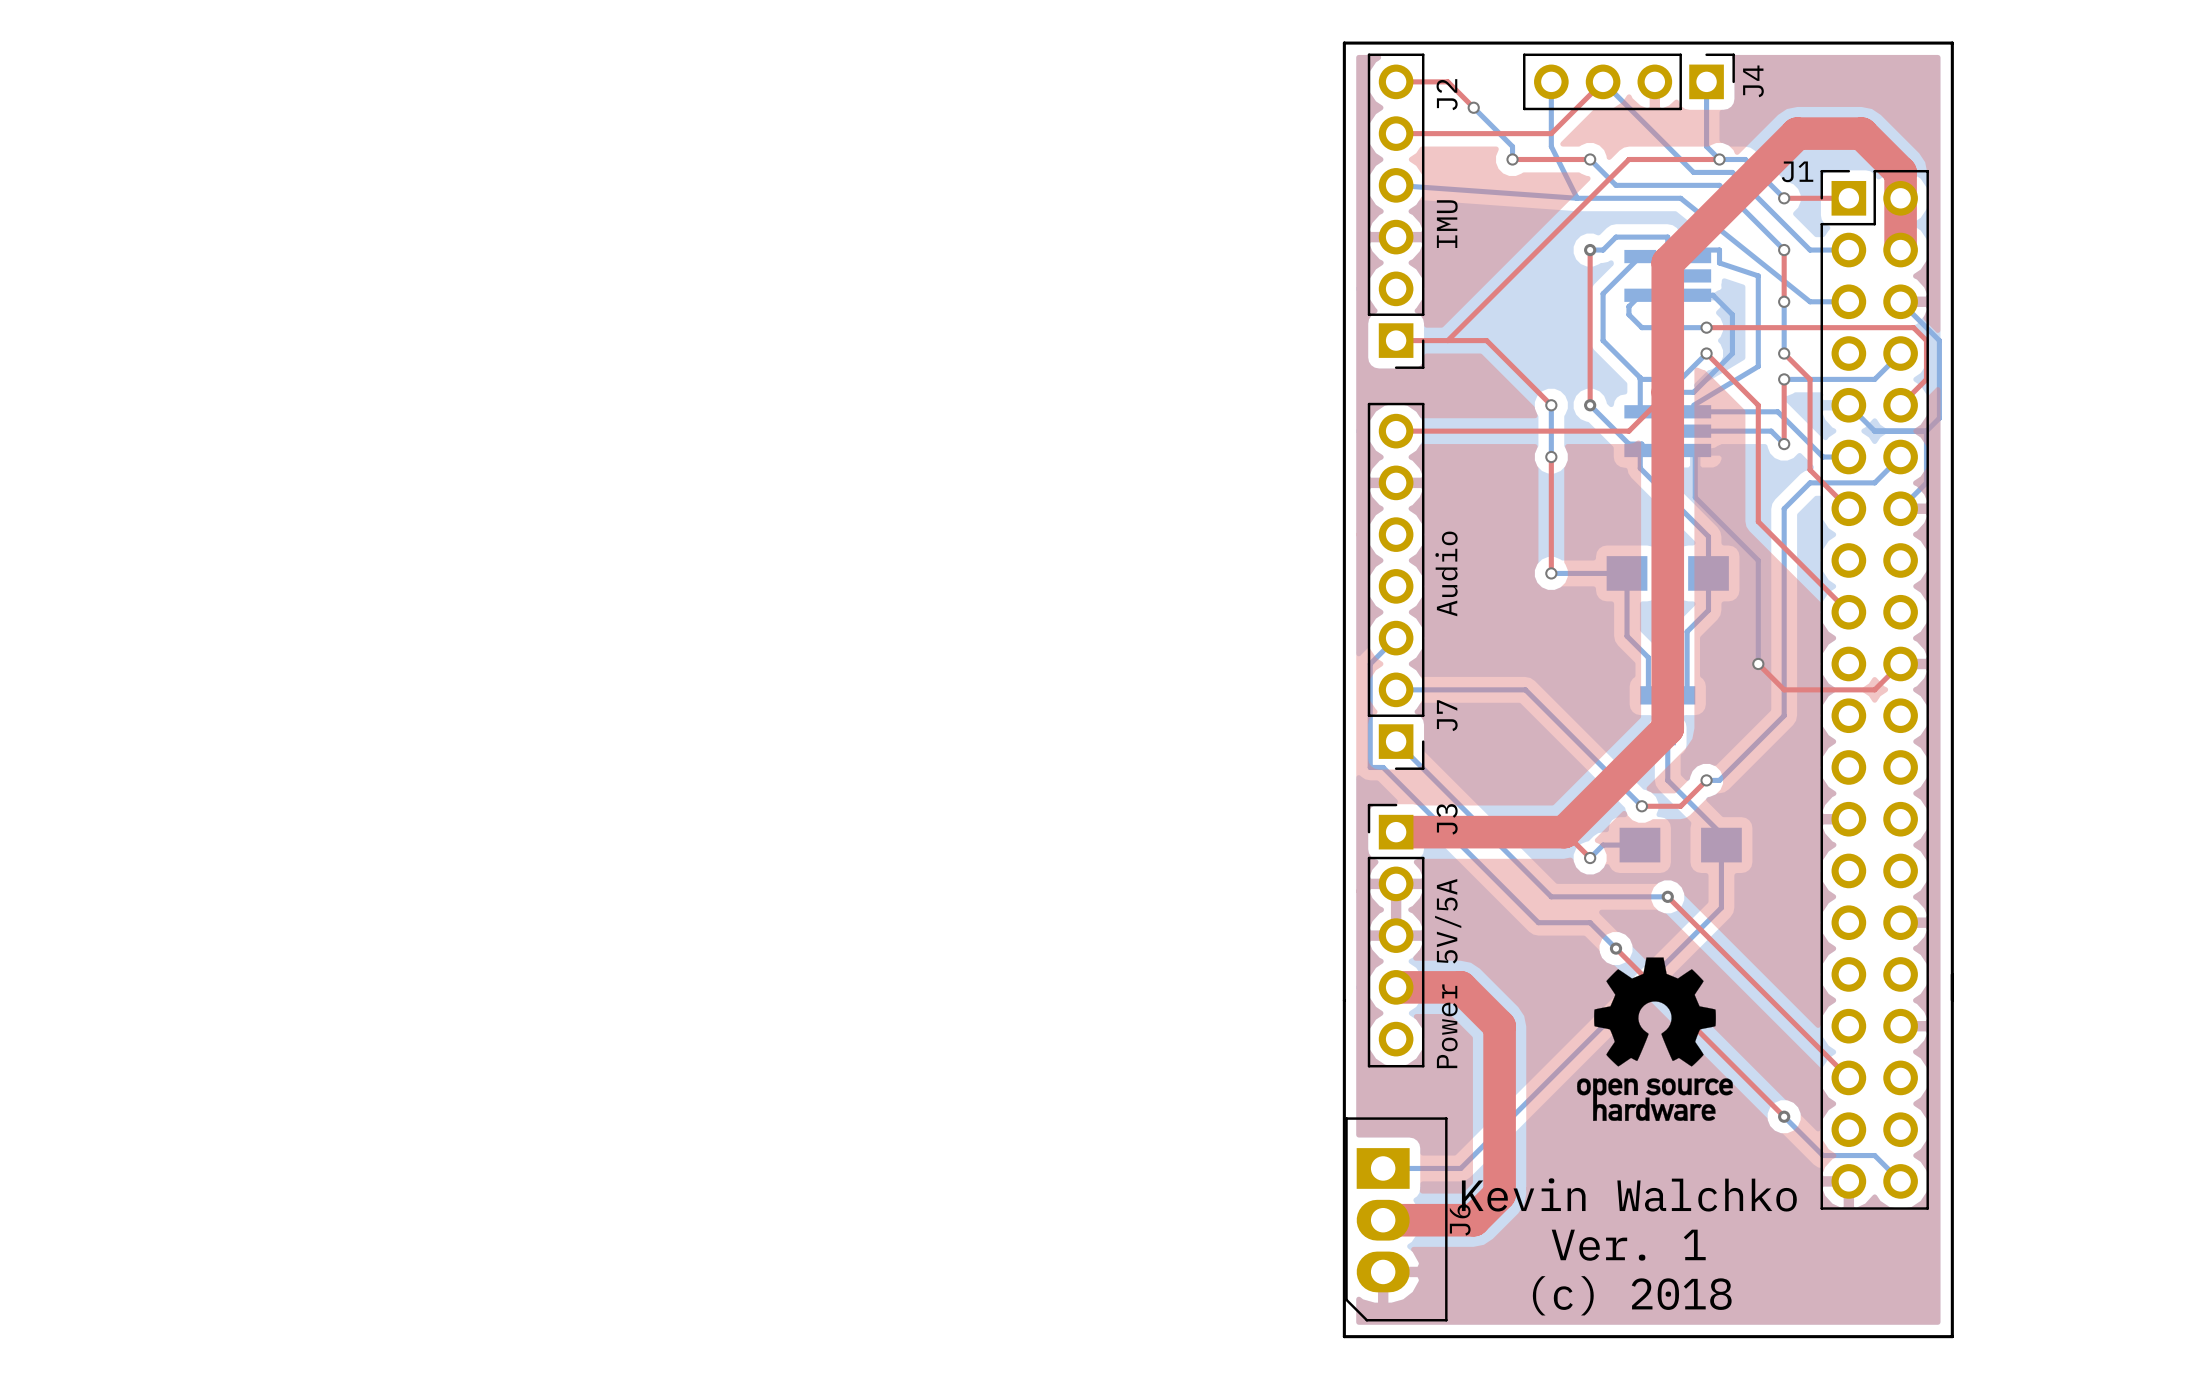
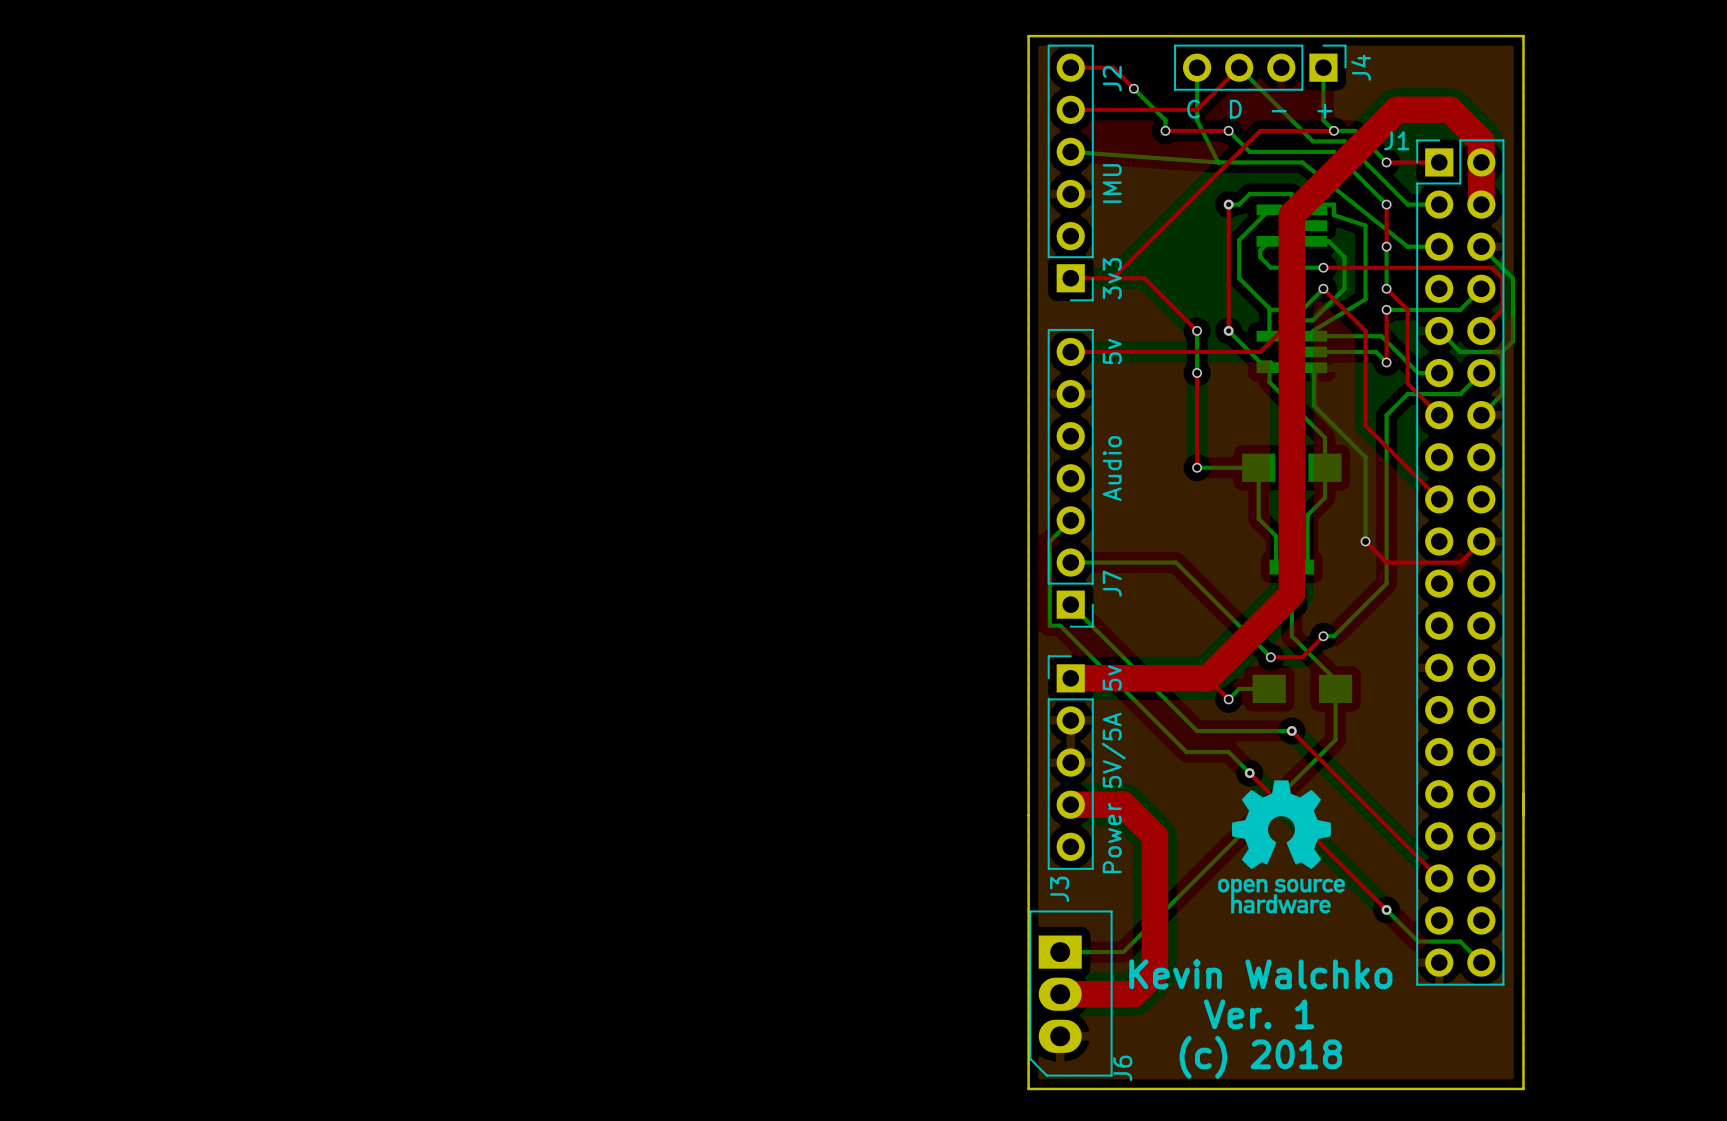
text: none -> C D - + (1259, 109)
text: none -> 3v3 (1112, 278)
text: none -> 5v (1112, 351)
J3 name position: J3 (1447, 819) -> J3 (1059, 889)
text: none -> 5v (1112, 677)
J6 name position: J6 (1460, 1220) -> J6 (1122, 1068)

